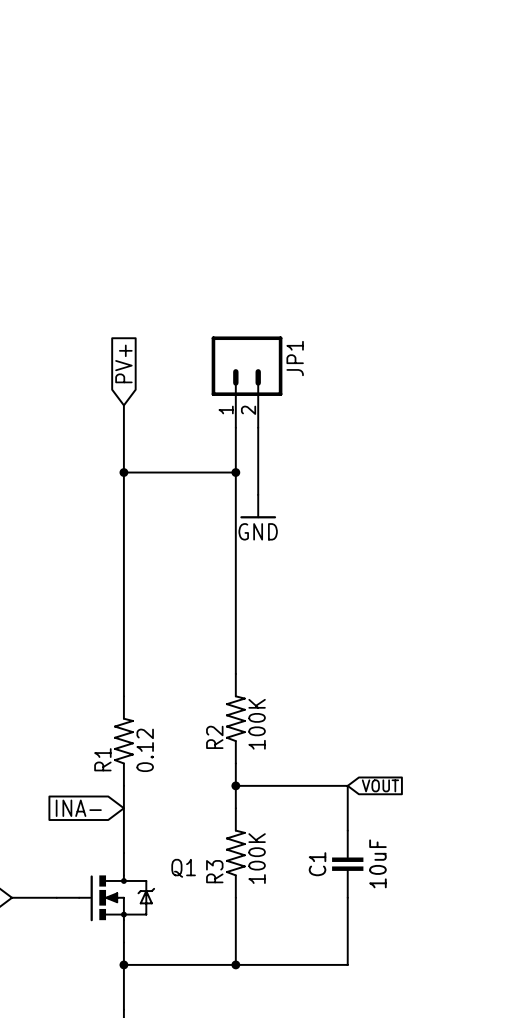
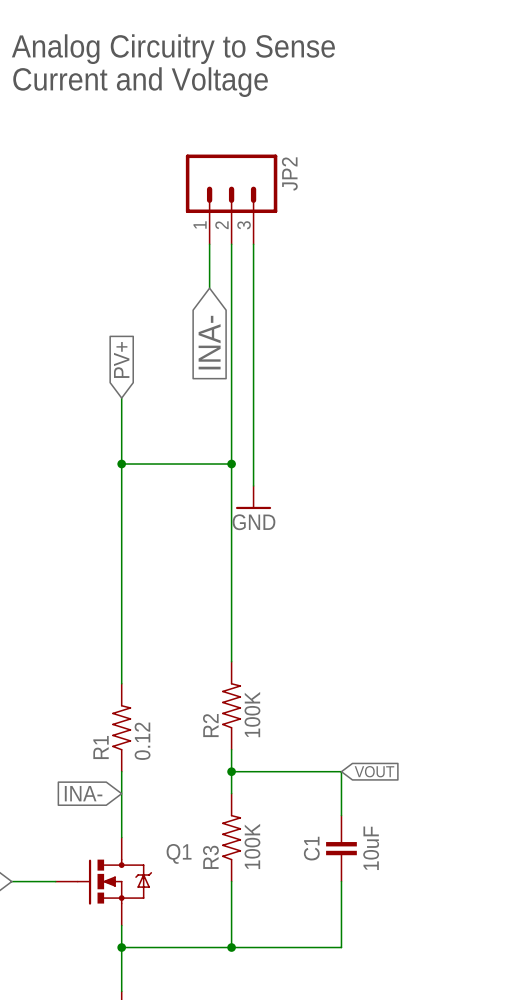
text: none -> Analog Circuitry to Sense (173, 49)
text: none -> Current and Voltage (140, 82)
JP2: none -> (231, 199)
wire: none -> (209, 244) (209, 288)
wire: none -> (231, 244) (231, 420)
wire: none -> (253, 244) (253, 420)
global label: none -> INA- (209, 342)
JP1: (247, 382) -> none

